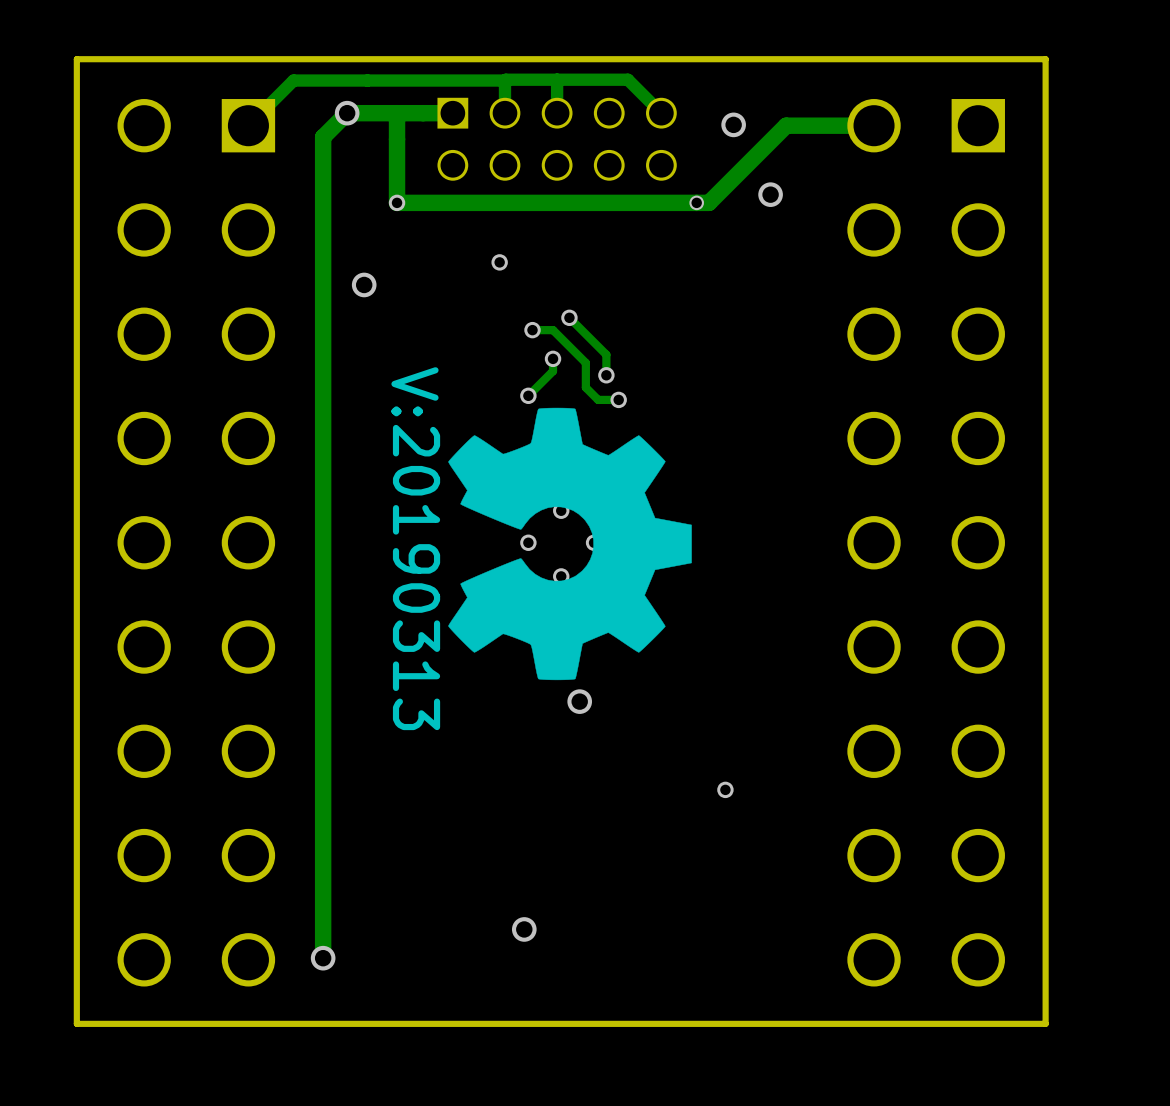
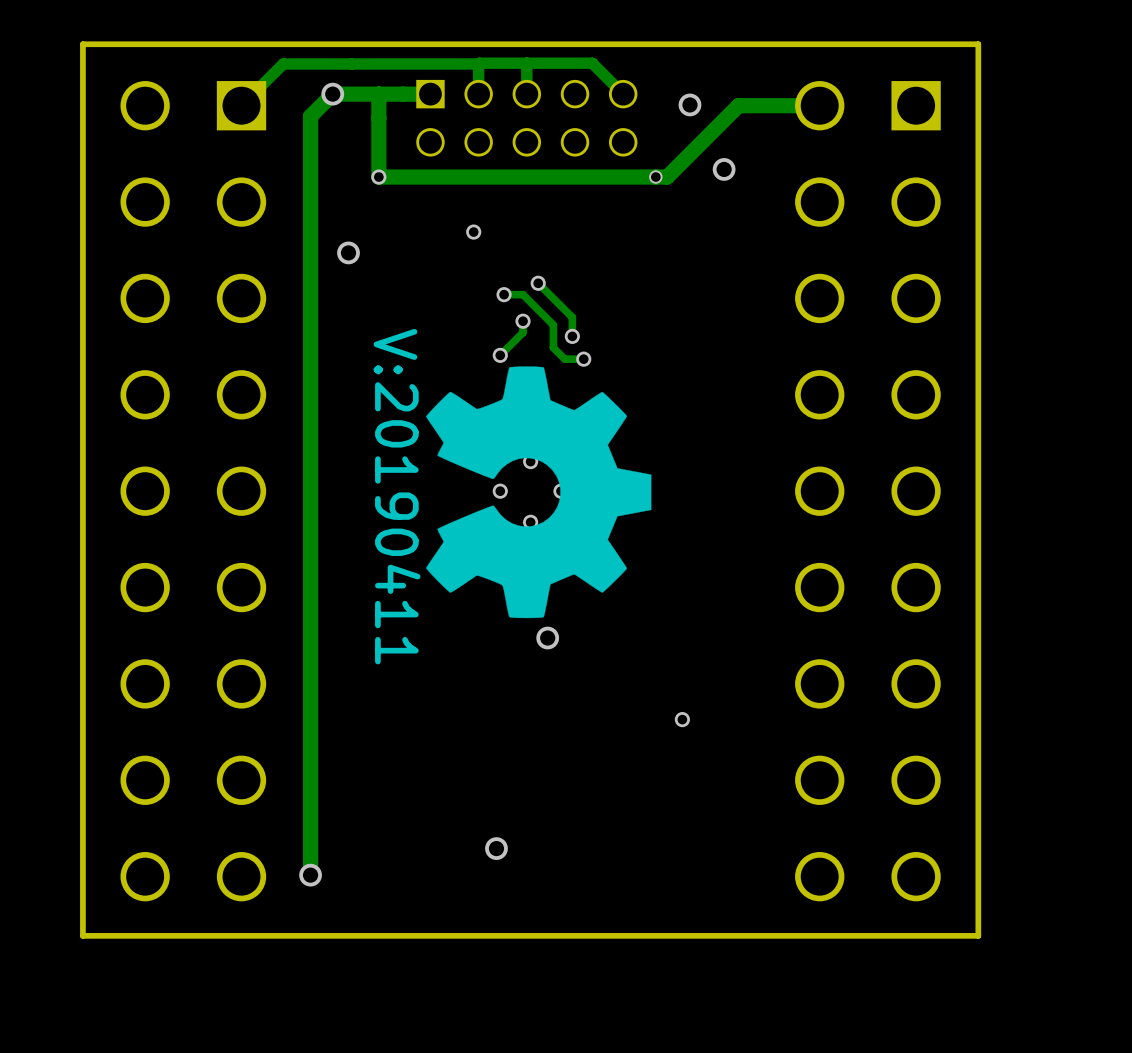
drawing shape: [391, 367, 441, 731] -> [373, 328, 421, 665]

